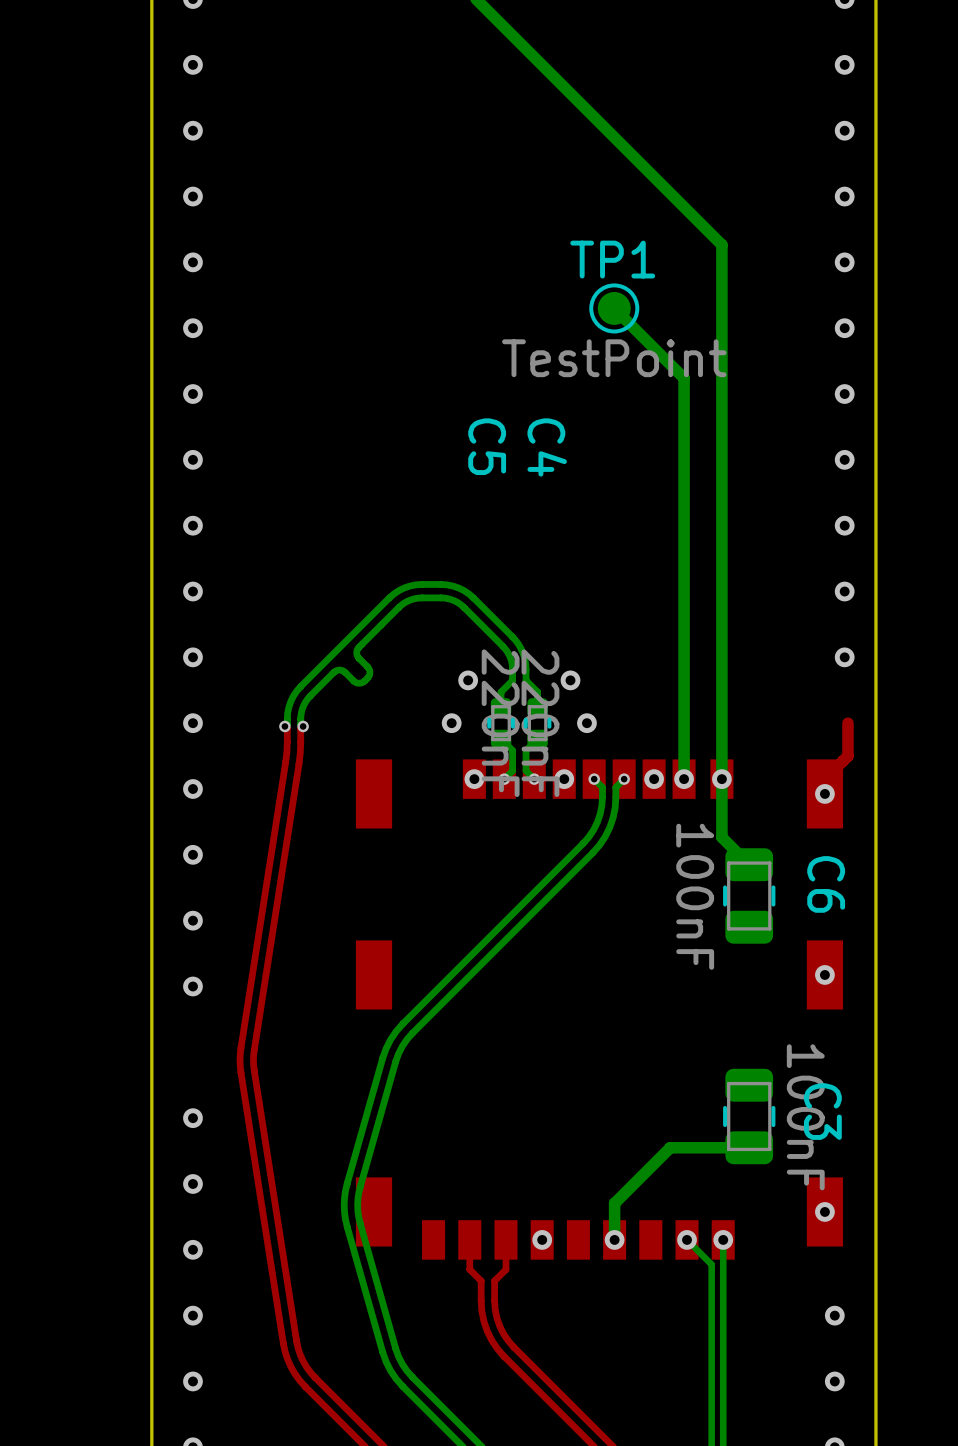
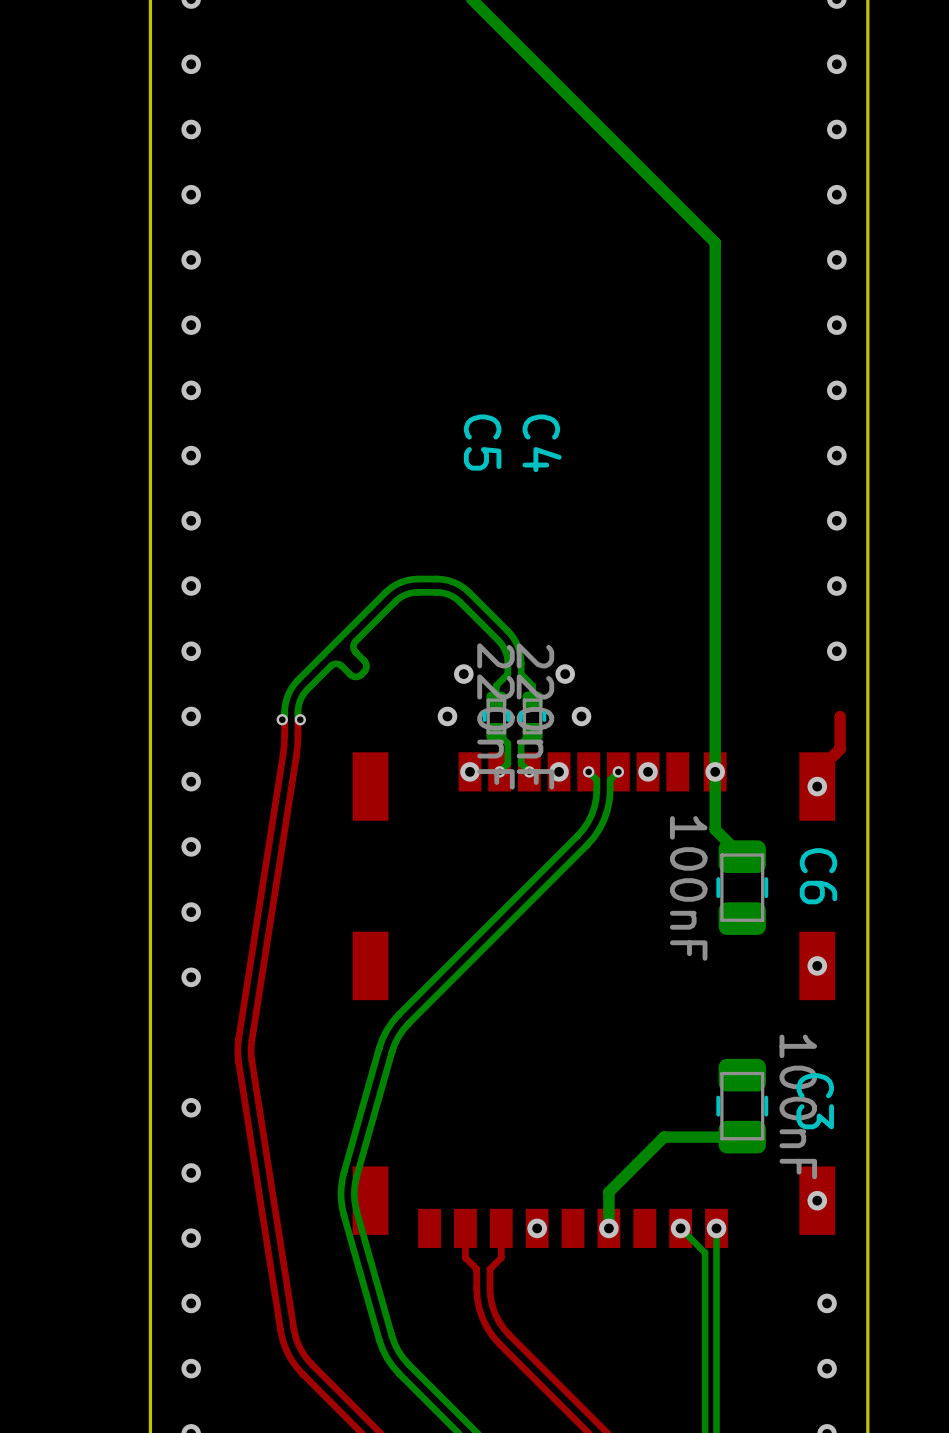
bottom track: (614, 308) (684, 378) (684, 779) -> none
TP1: TestPoint (614, 308) -> none
via: (684, 779) -> none

